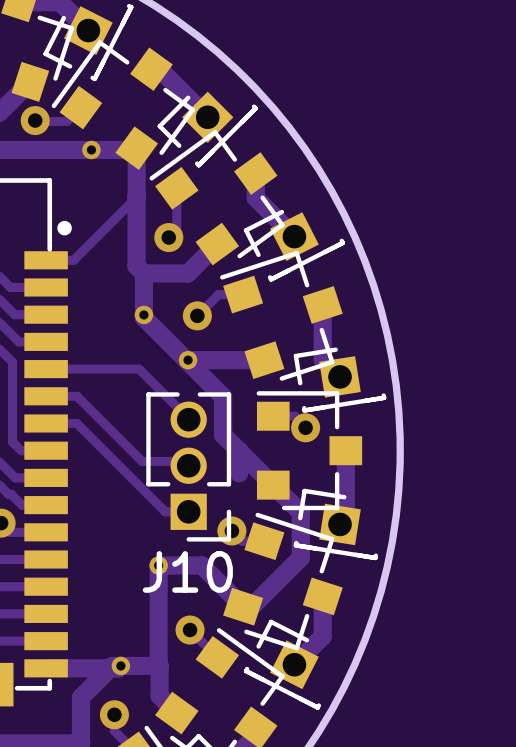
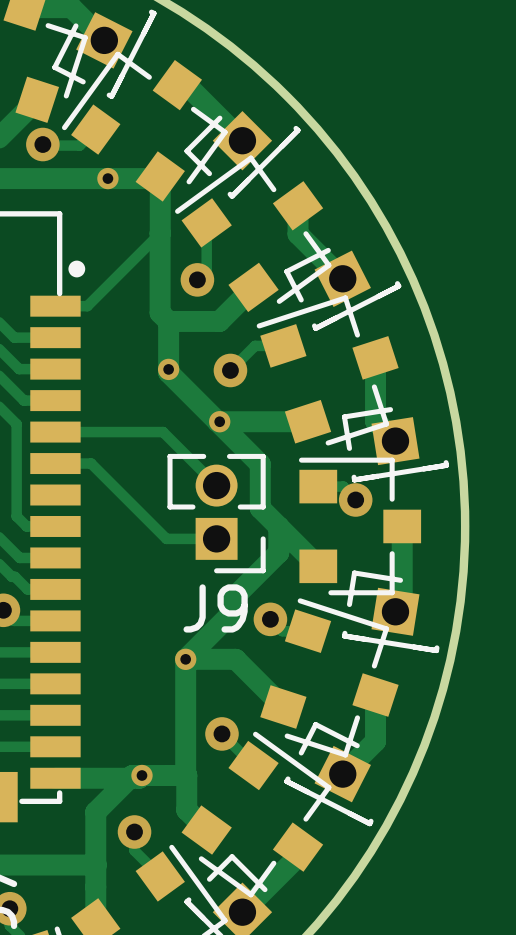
track: (46, 423) (76, 423) (165, 511) (188, 511) -> none
J9: none -> (216, 513)
J10: (188, 466) -> none
track: none -> (278, 552) (233, 597) (233, 611) (185, 659)
track: (273, 485) (300, 512) (300, 557) (251, 606) (243, 606) -> none

